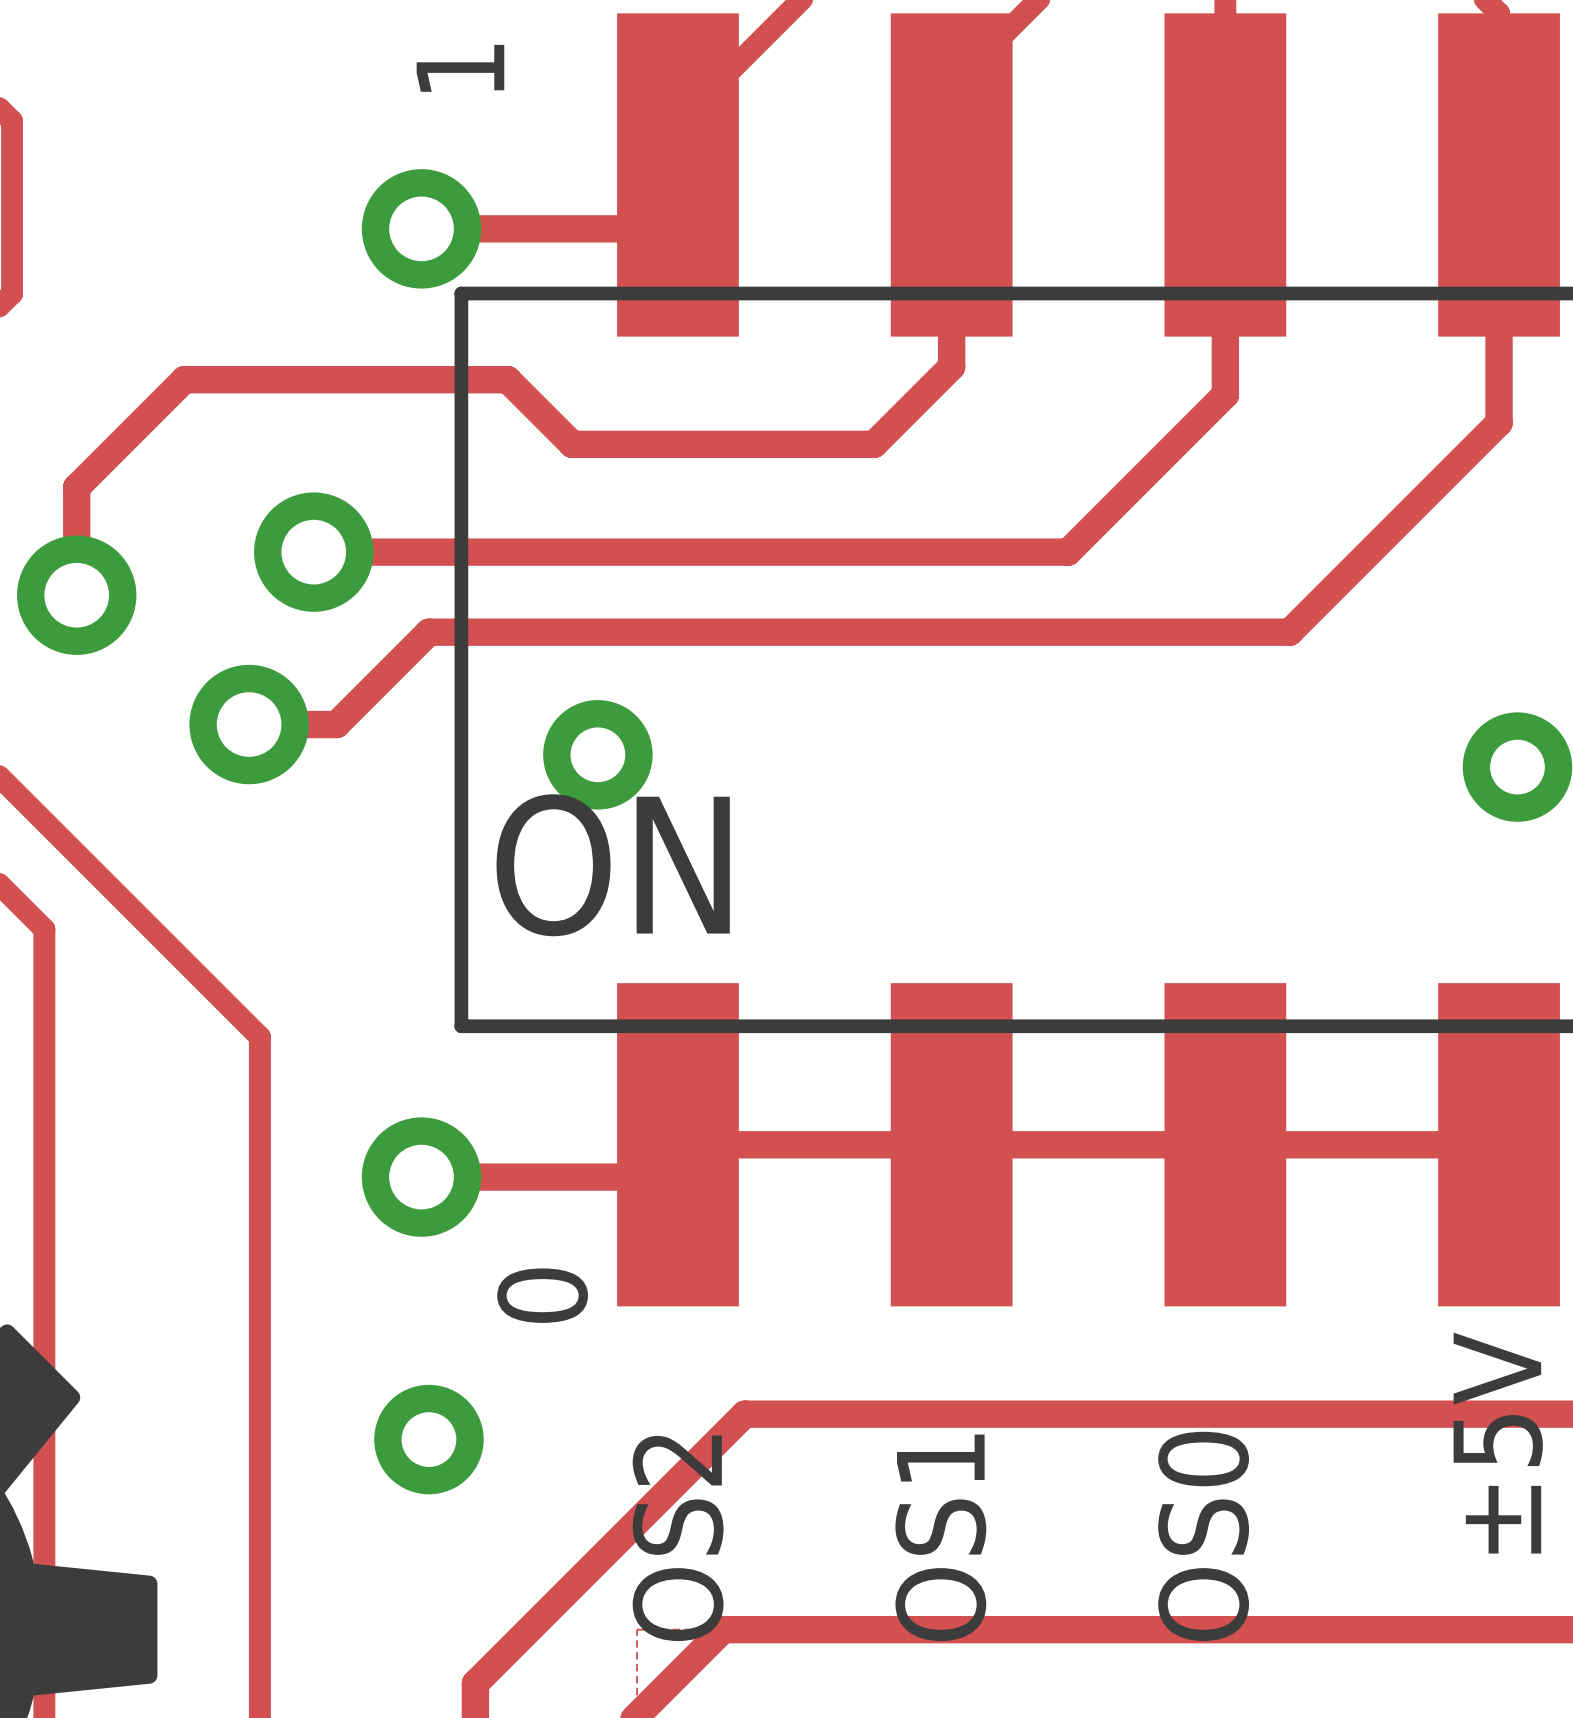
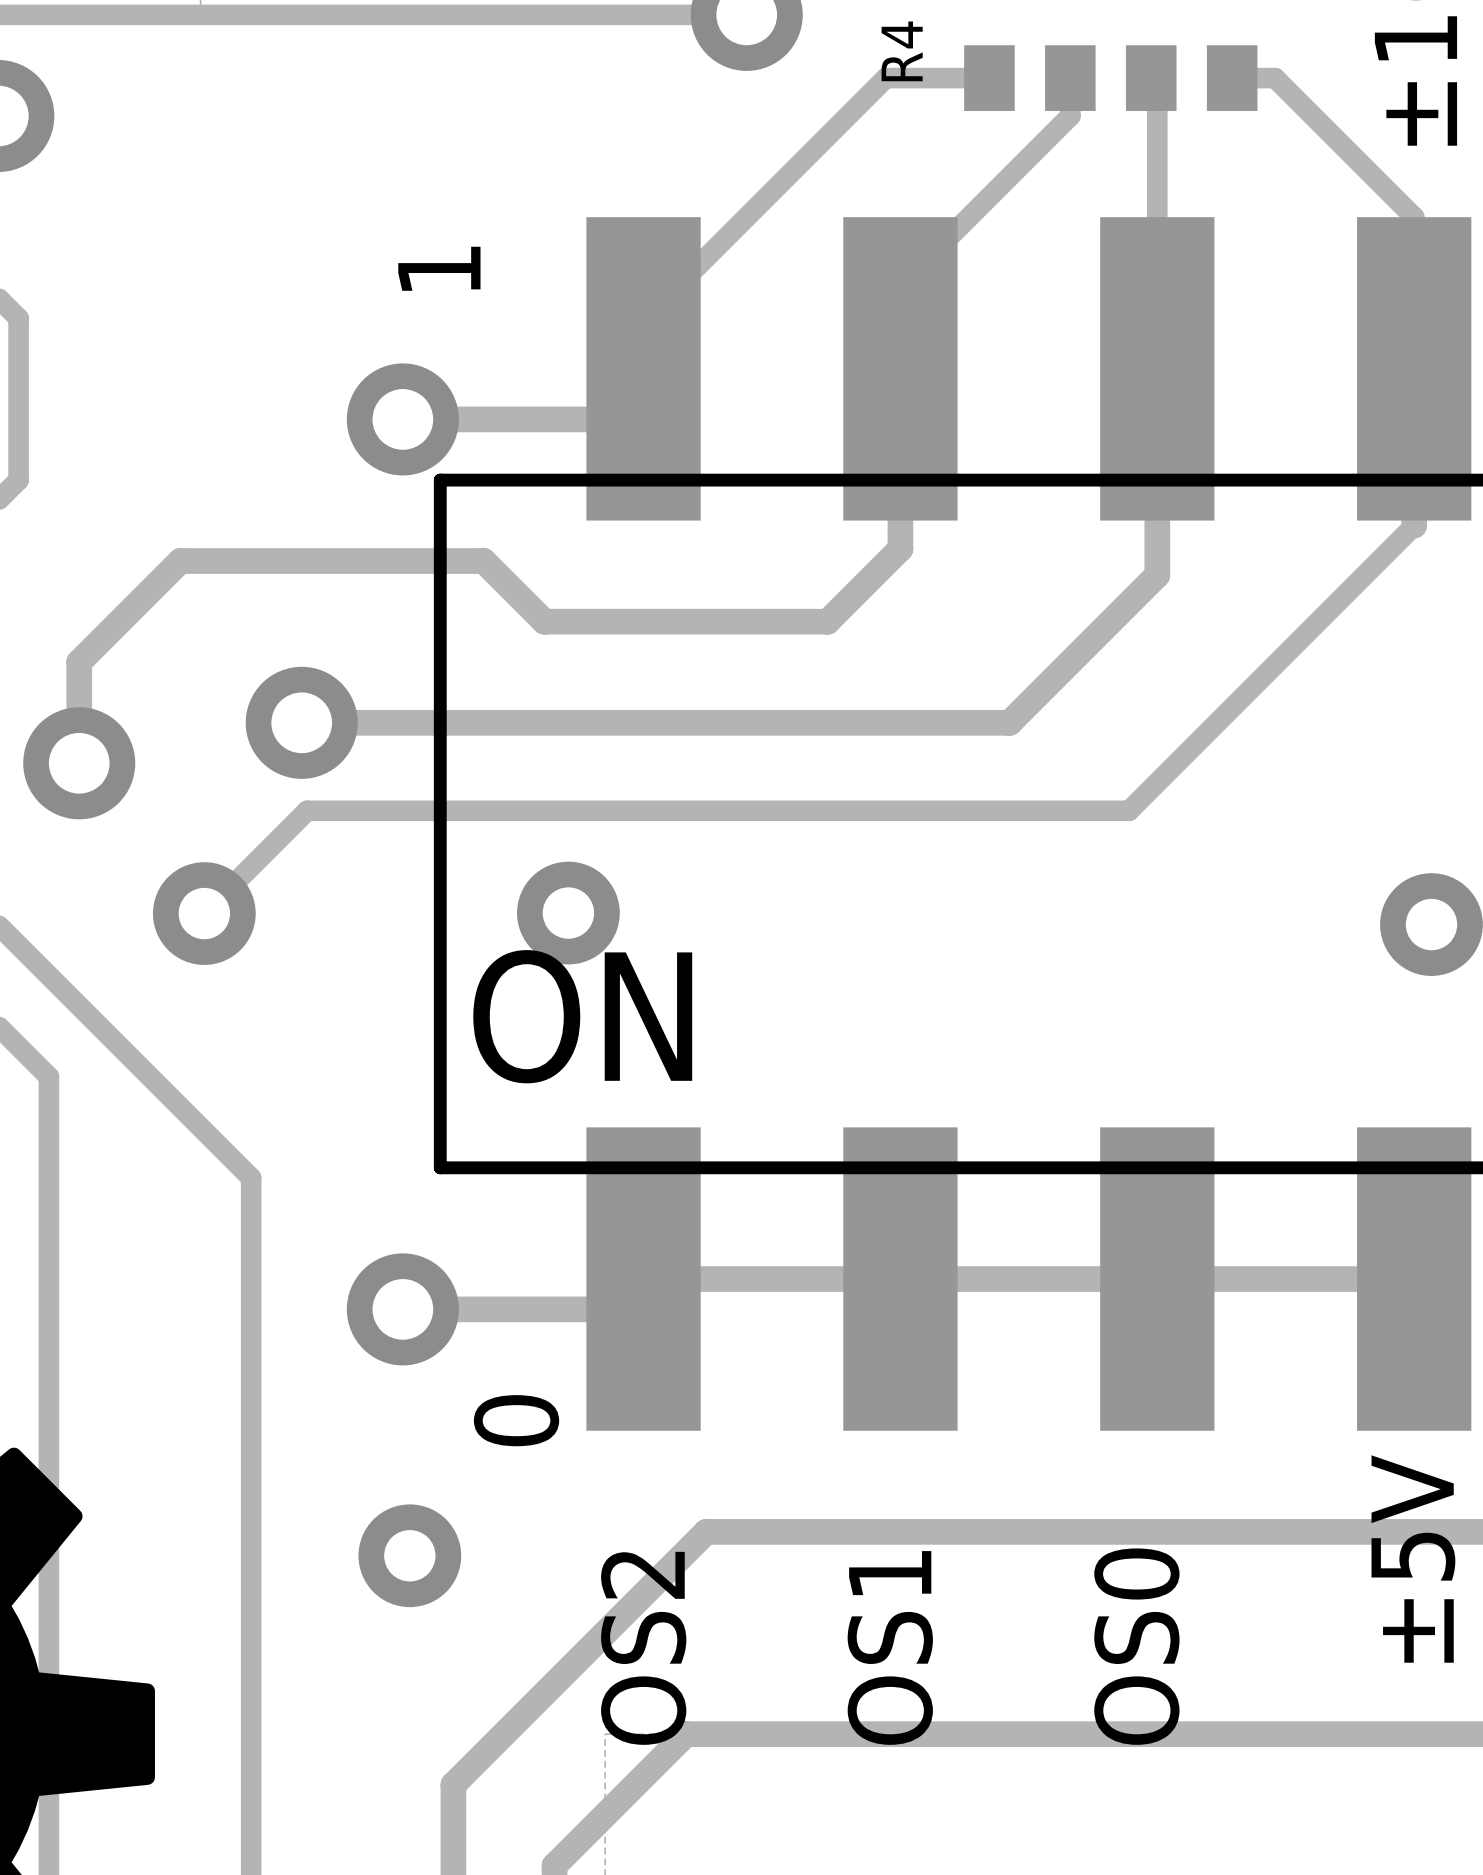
track: (1499, 342) (1499, 422) (1289, 632) (428, 632) (336, 724) (249, 724) -> (1414, 525) (1129, 810) (307, 810) (204, 913)
via position: (249, 724) -> (204, 913)

